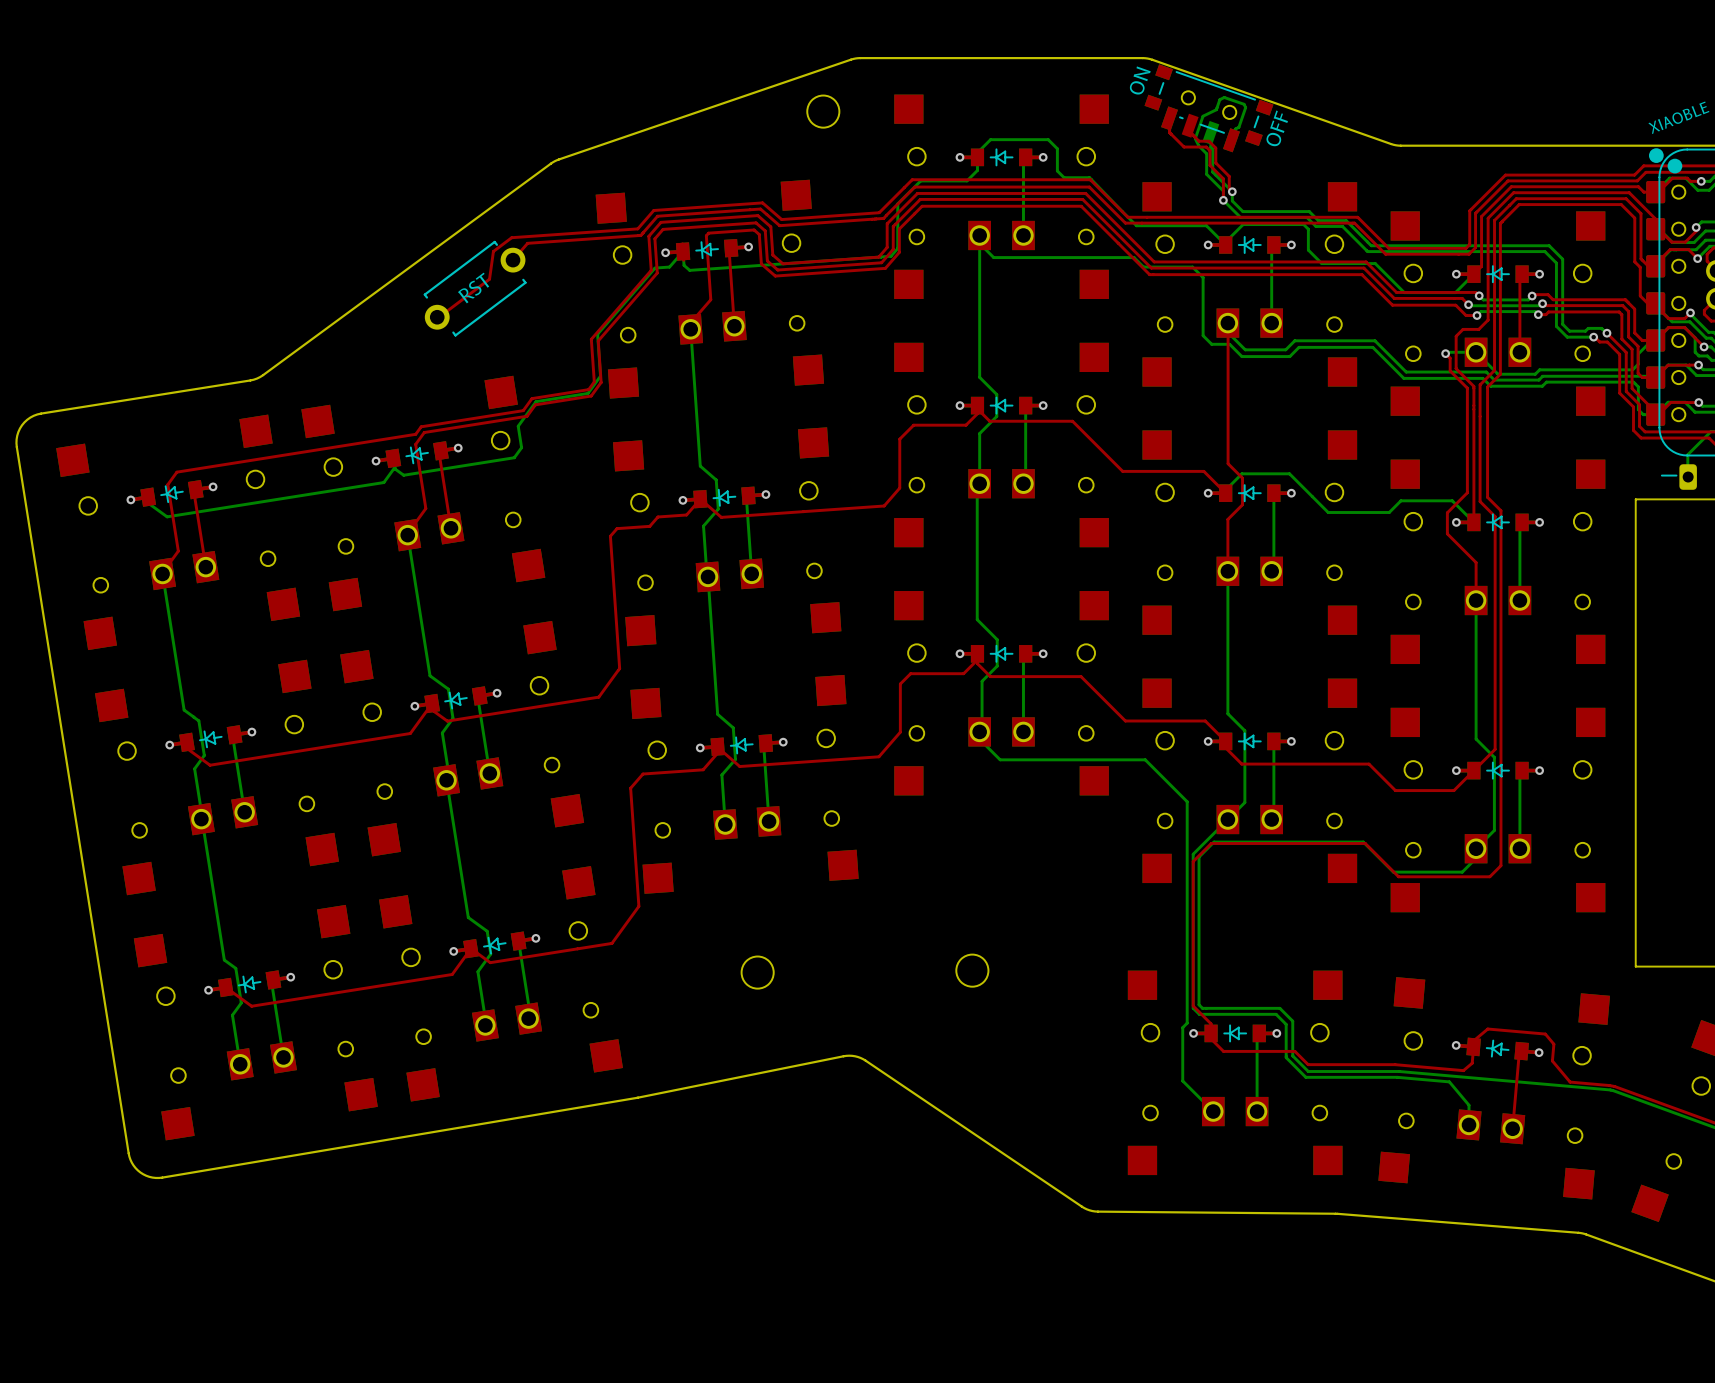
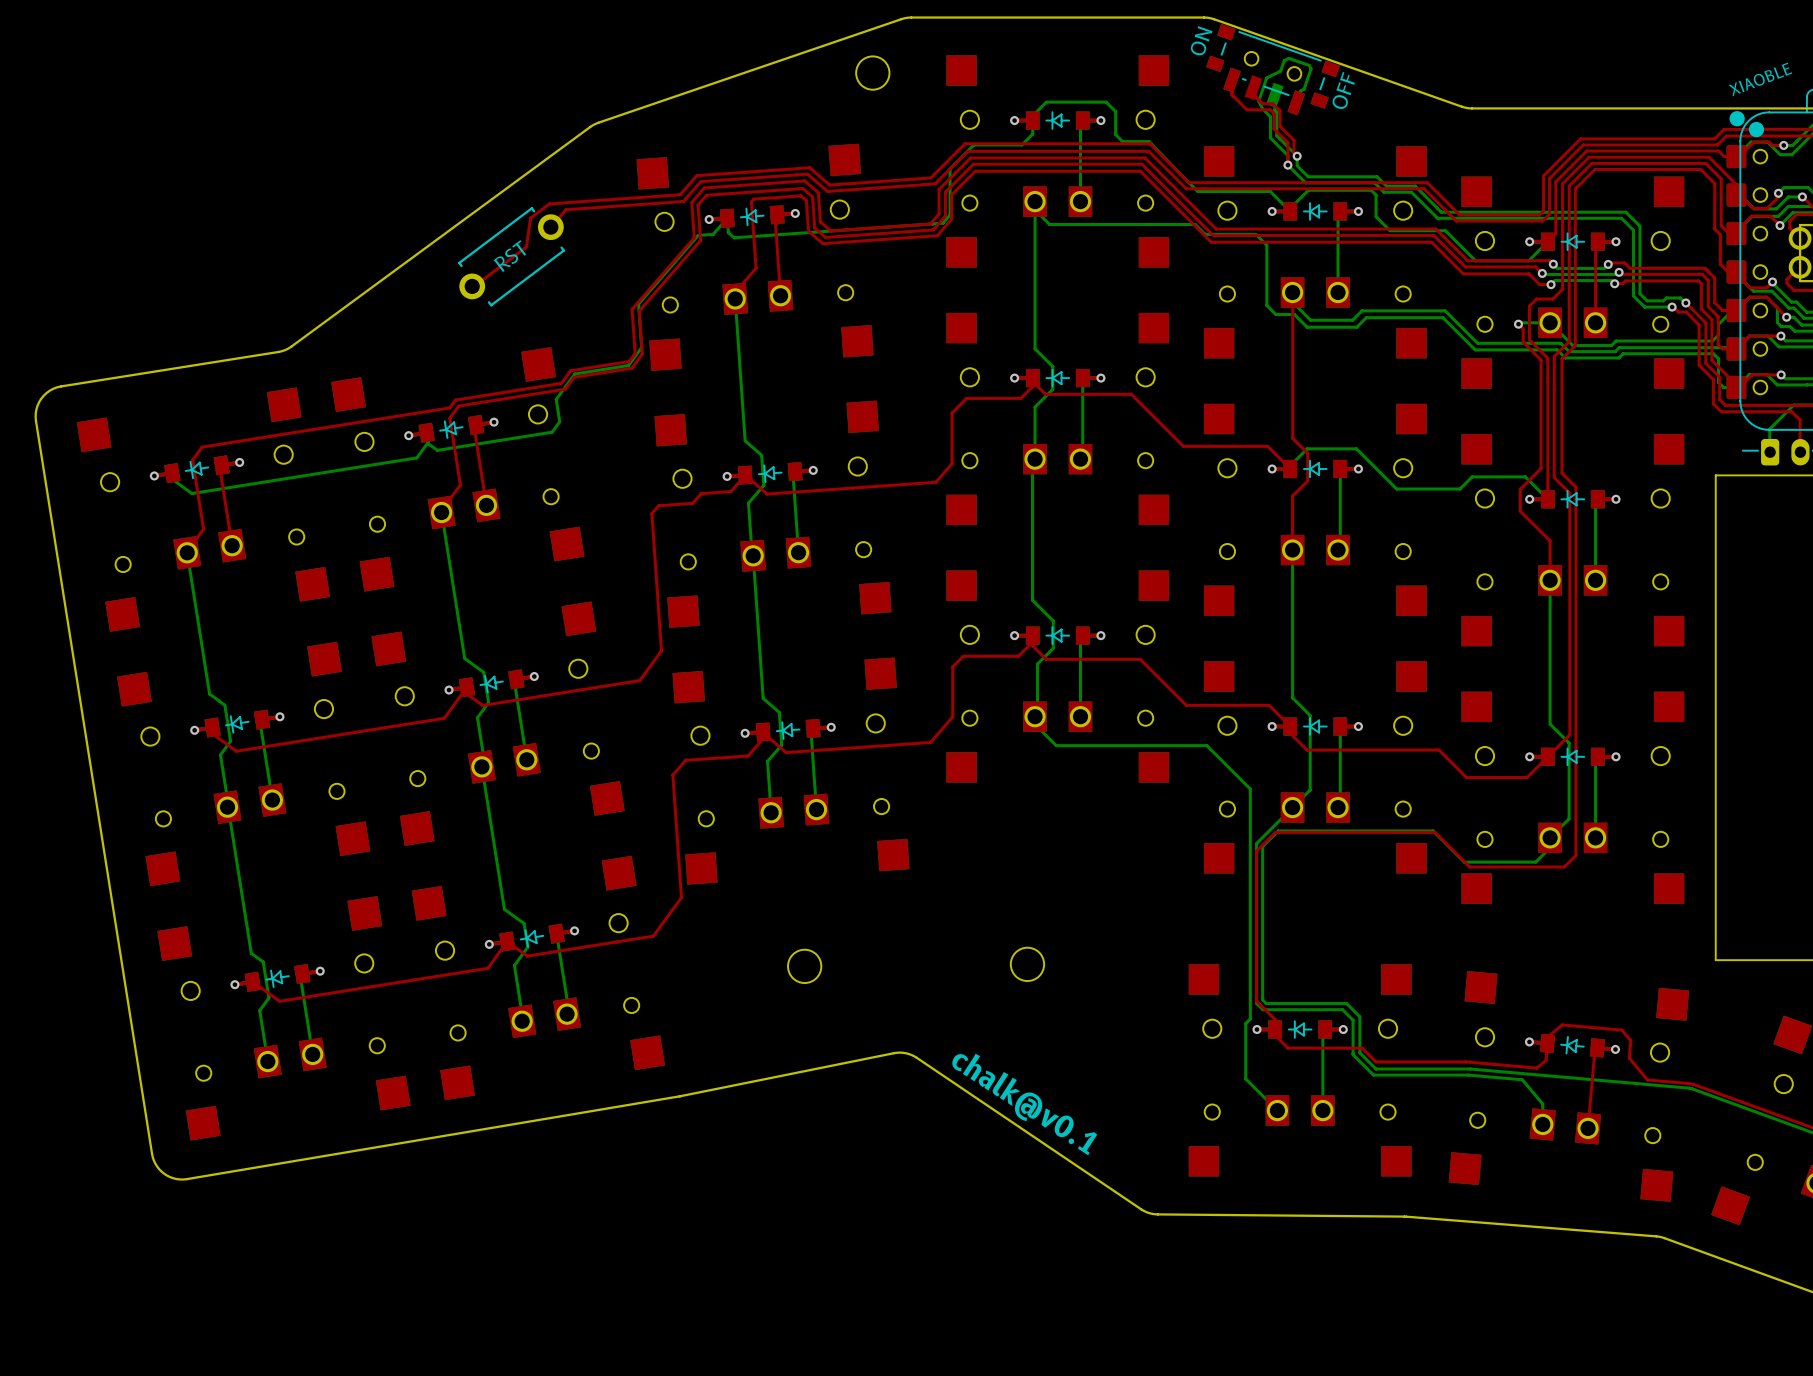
text: none -> chalk@v0.1 (1024, 1104)

